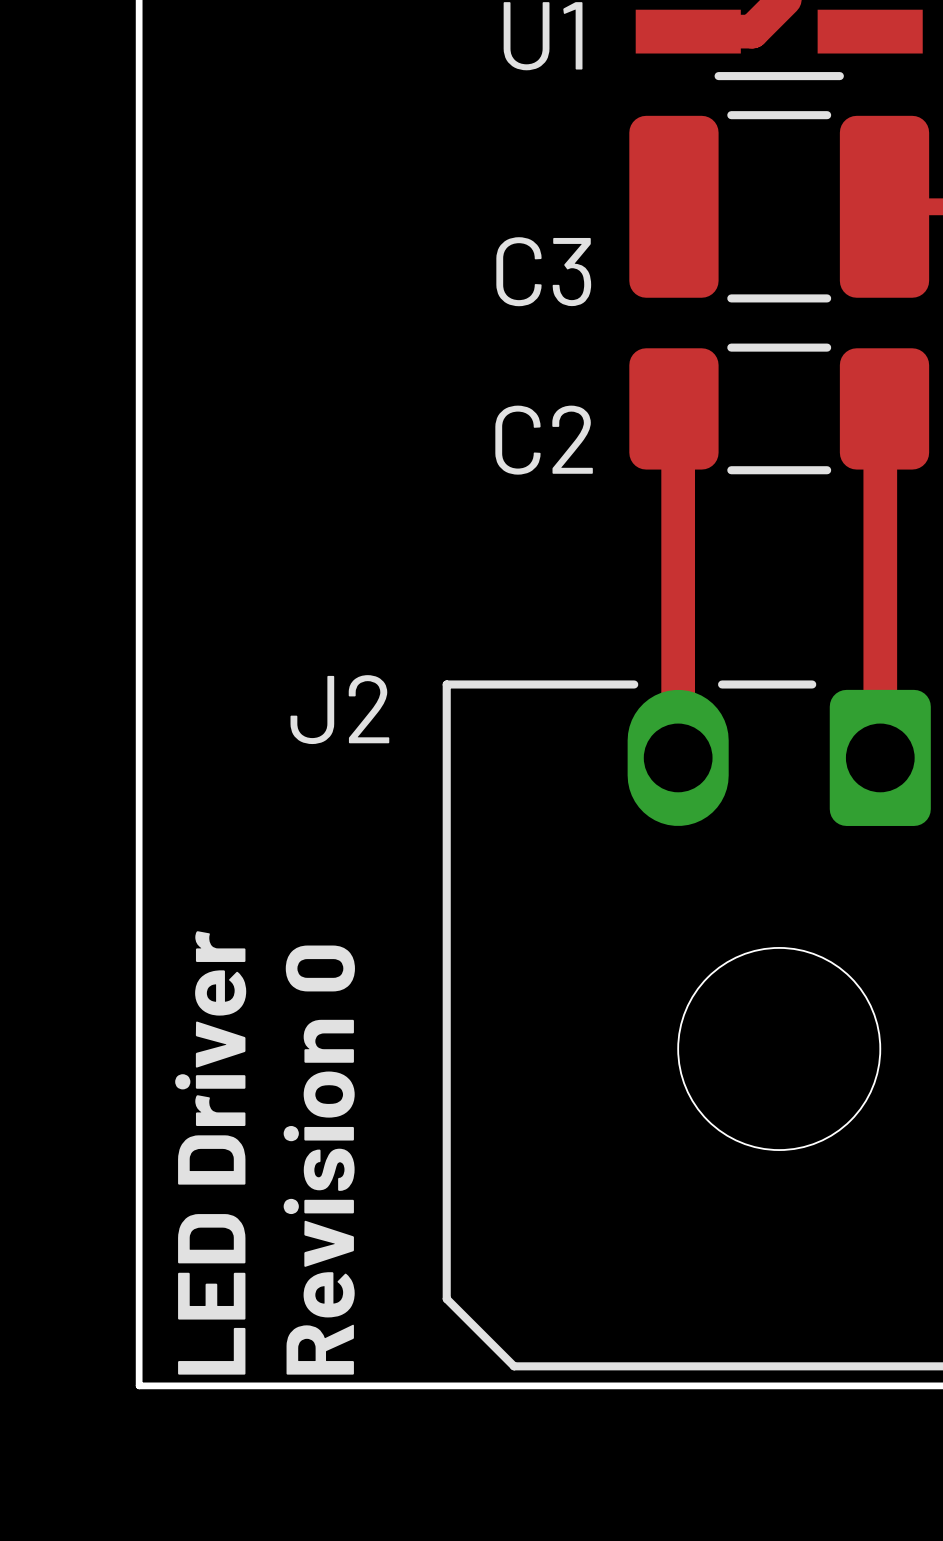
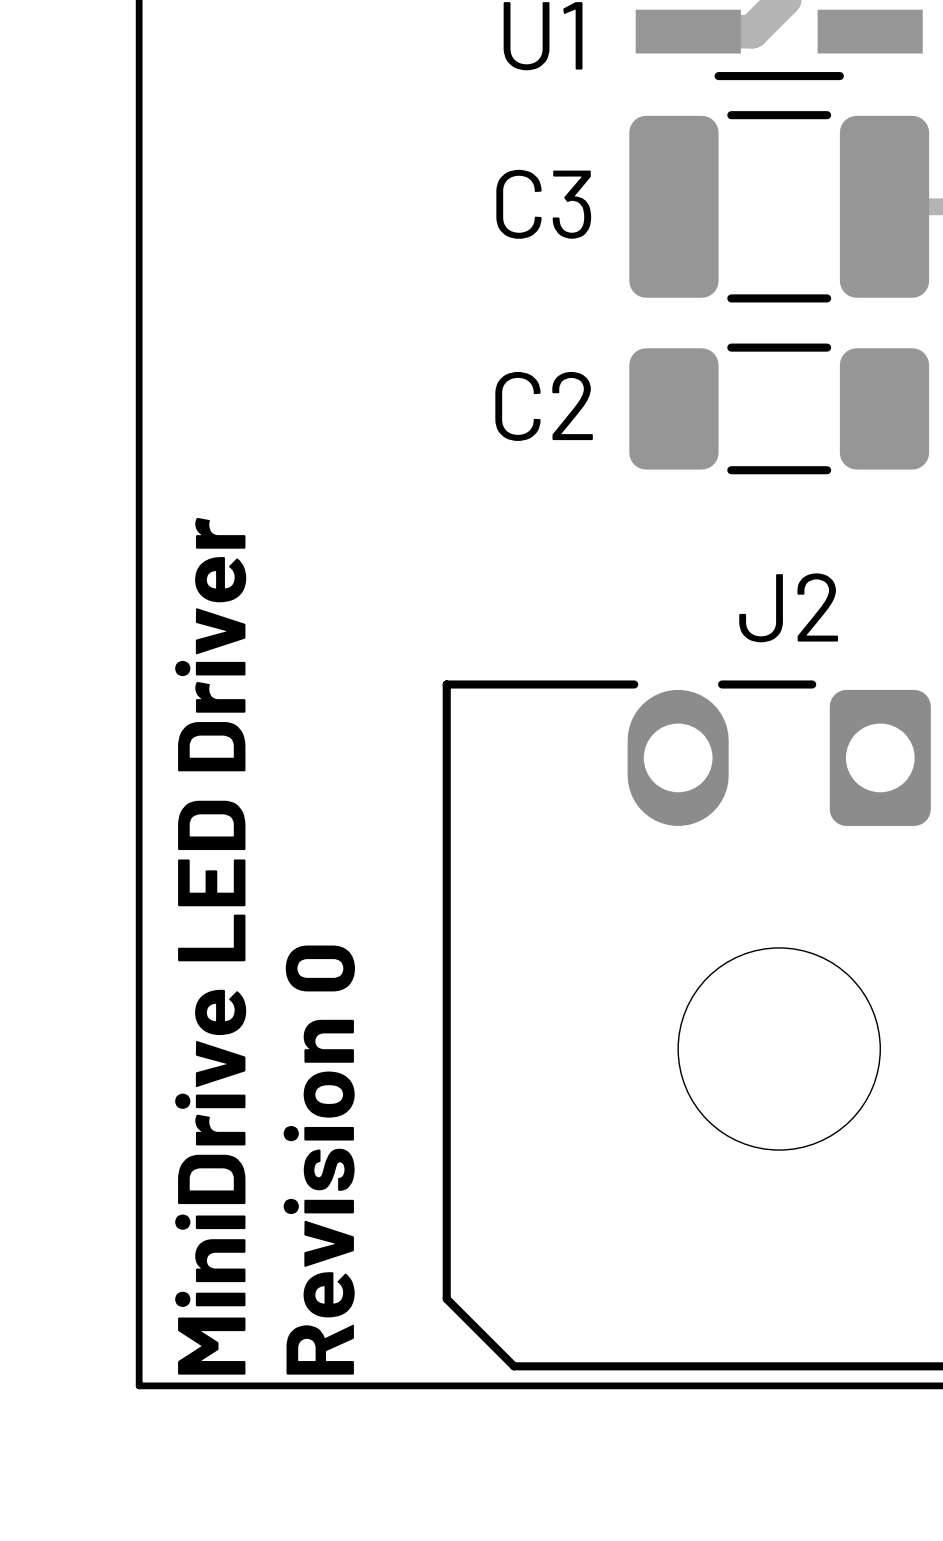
C3 name position: C3 (543, 271) -> C3 (543, 204)
track: (673, 408) (678, 413) (678, 757) -> none
track: (884, 408) (880, 413) (880, 757) -> none
C2 name position: C2 (544, 440) -> C2 (544, 406)
J2 name position: J2 (339, 709) -> J2 (788, 607)
text: LED Driver (210, 1152) -> MiniDrive LED Driver (210, 946)

